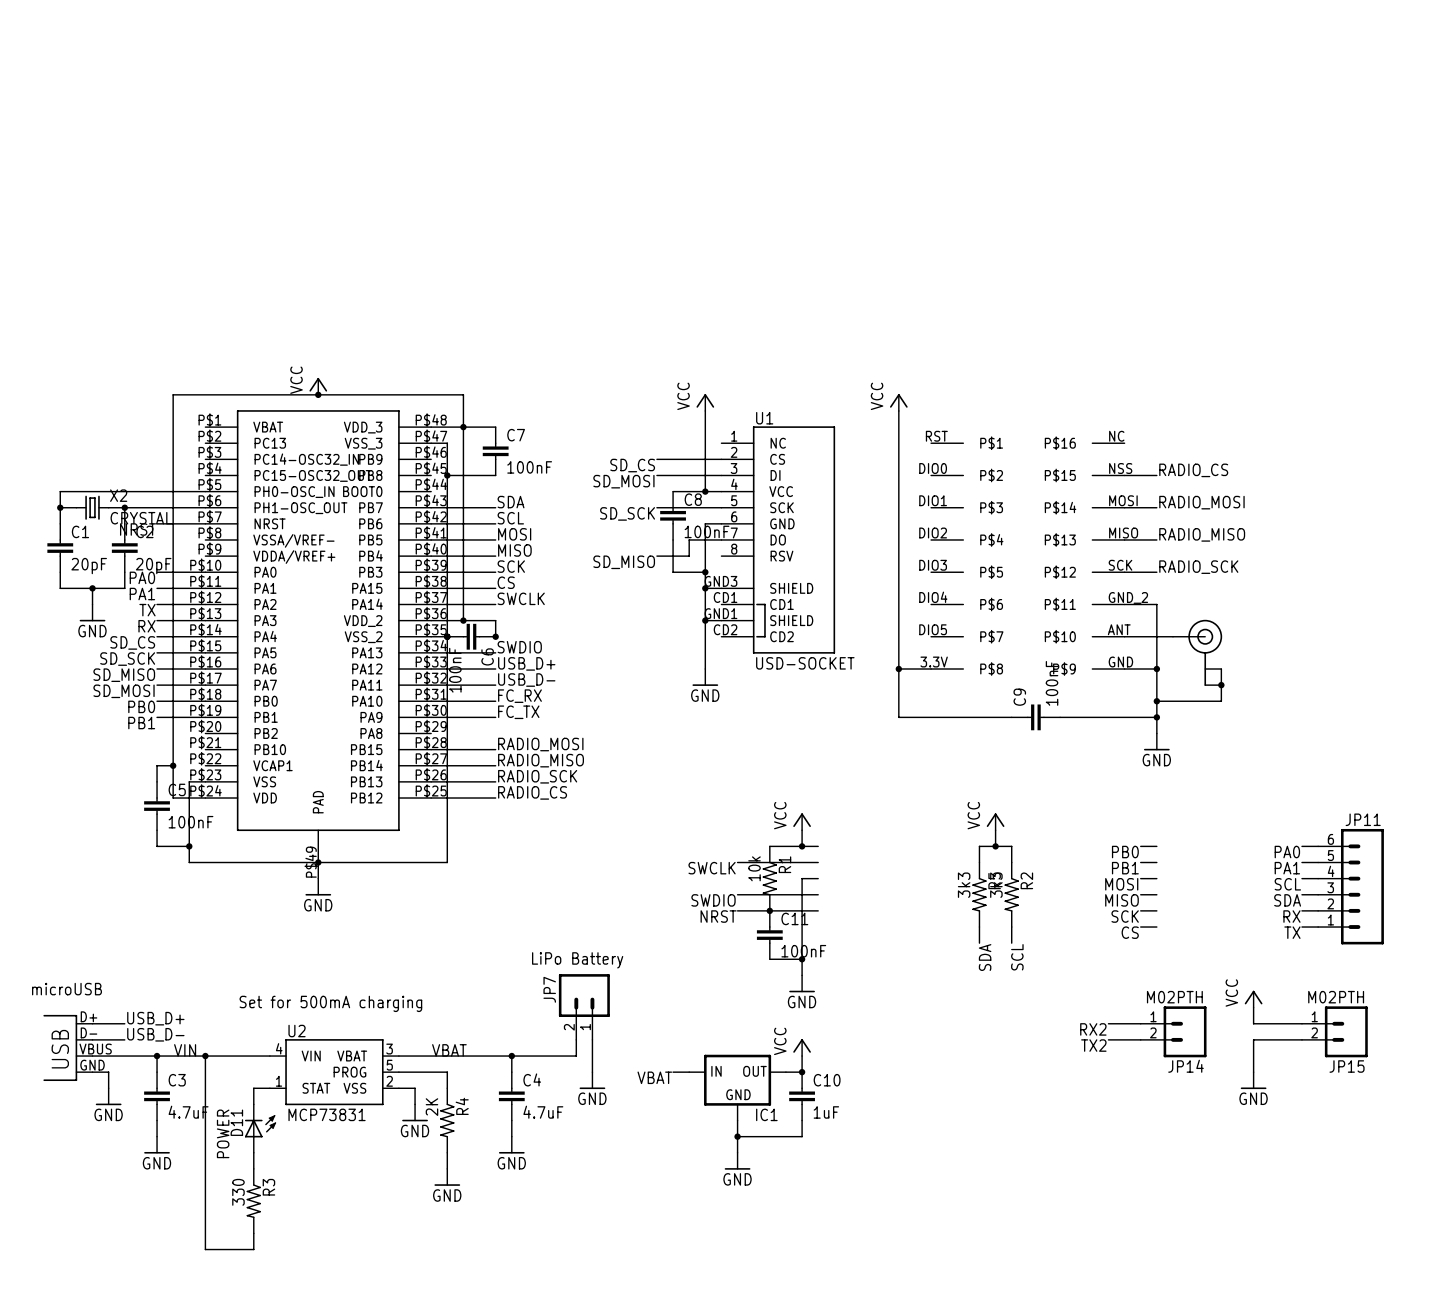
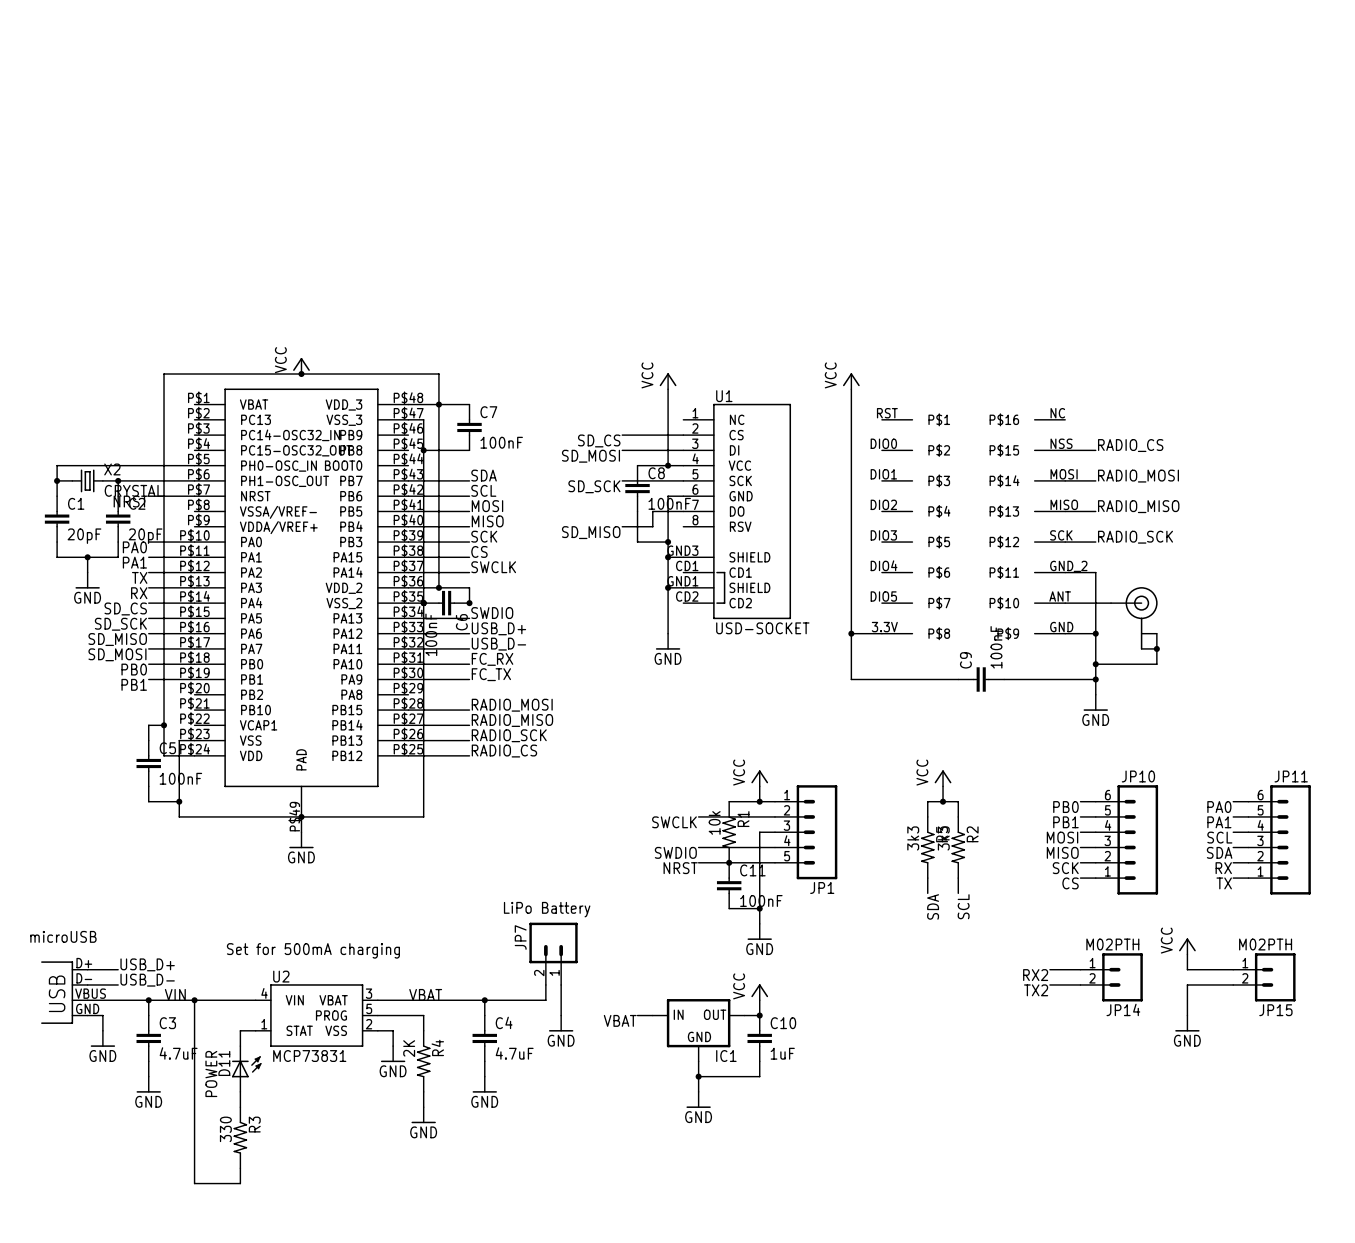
JP1: none -> (806, 832)
JP10: none -> (1126, 839)

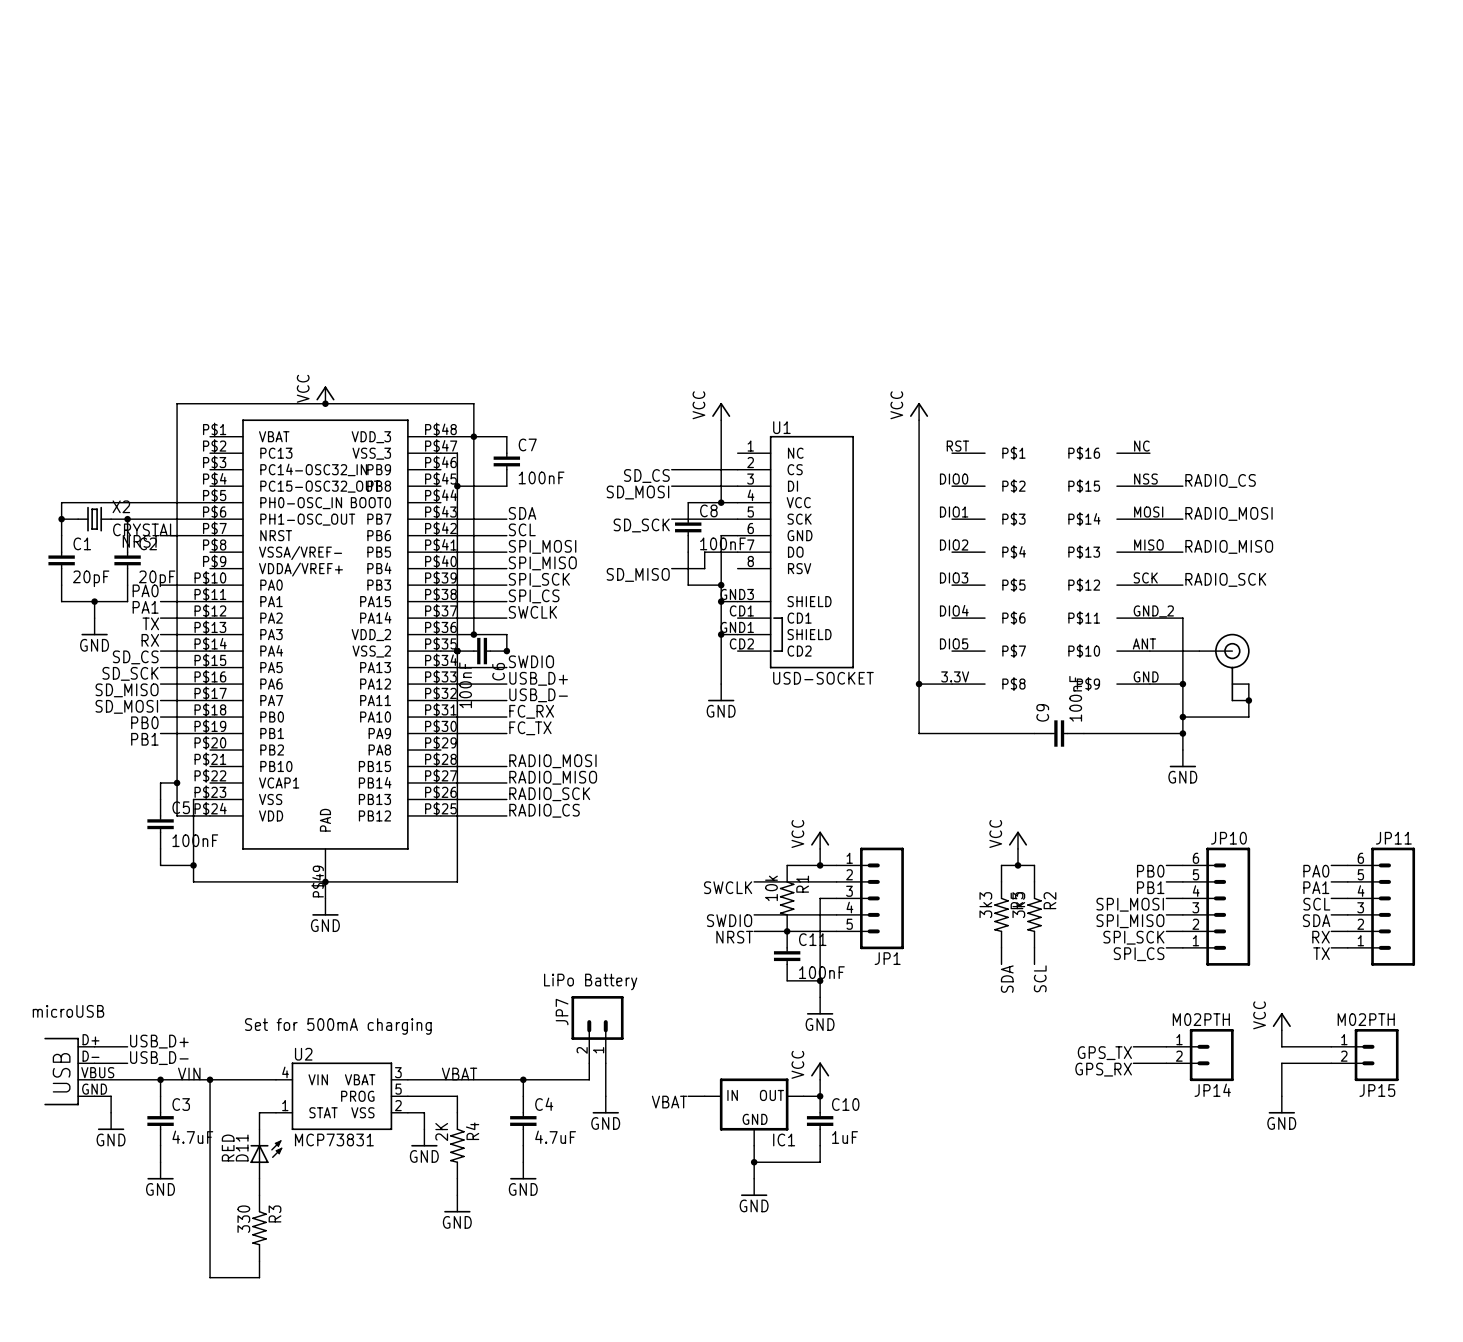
label: MOSI (487, 506) -> SPI_MOSI (542, 546)
label: MISO (487, 521) -> SPI_MISO (542, 563)
label: SCK (484, 536) -> SPI_SCK (539, 579)
label: CS (479, 551) -> SPI_CS (534, 596)
label: MOSI (1062, 837) -> SPI_MOSI (1130, 904)
label: MISO (1062, 852) -> SPI_MISO (1130, 921)
label: SCK (1065, 868) -> SPI_SCK (1133, 937)
label: CS (1070, 883) -> SPI_CS (1139, 954)
label: RX2 (1035, 975) -> GPS_TX (1104, 1053)
label: TX2 (1036, 990) -> GPS_RX (1103, 1069)
D11 value: POWER (211, 1073) -> RED (228, 1148)

